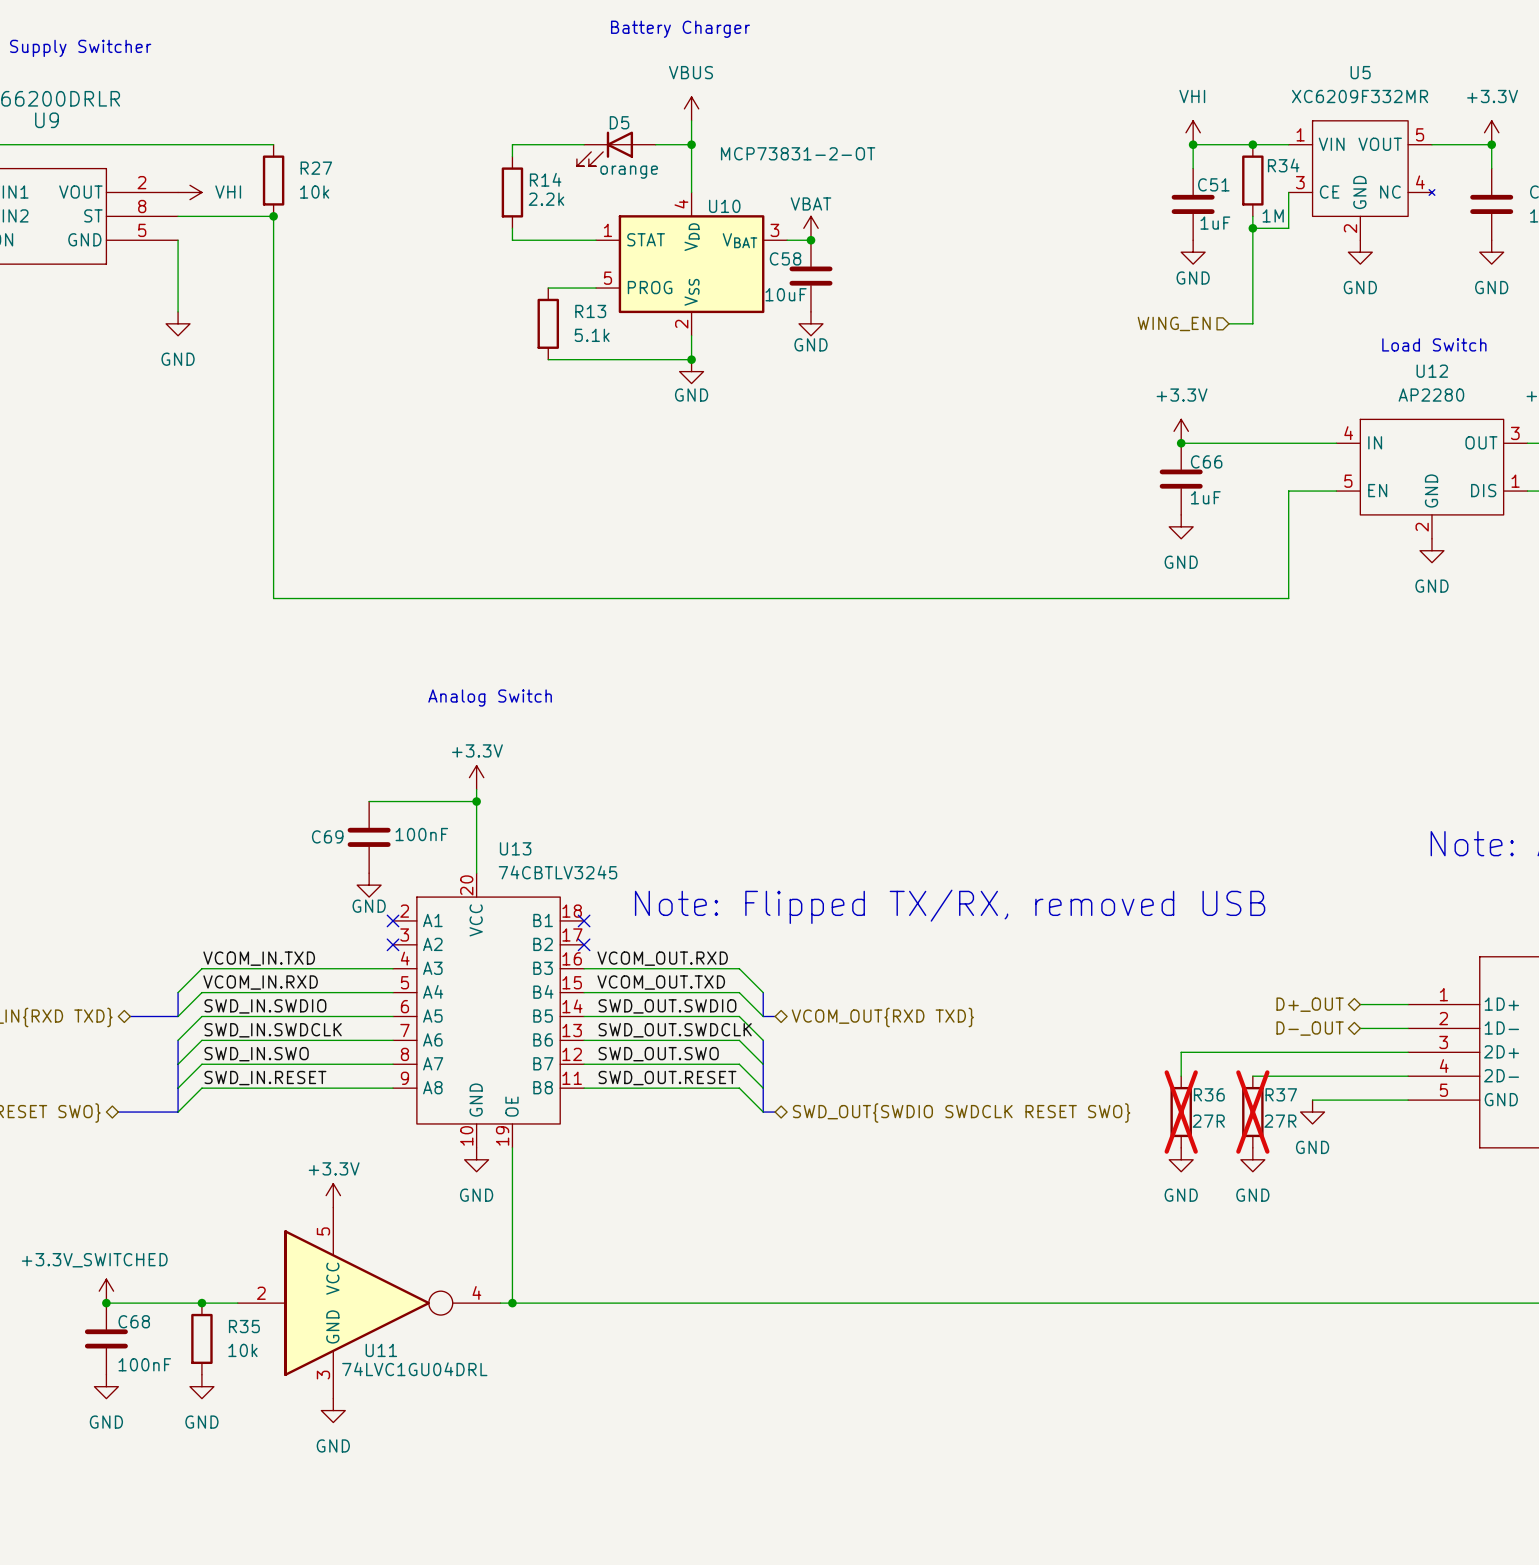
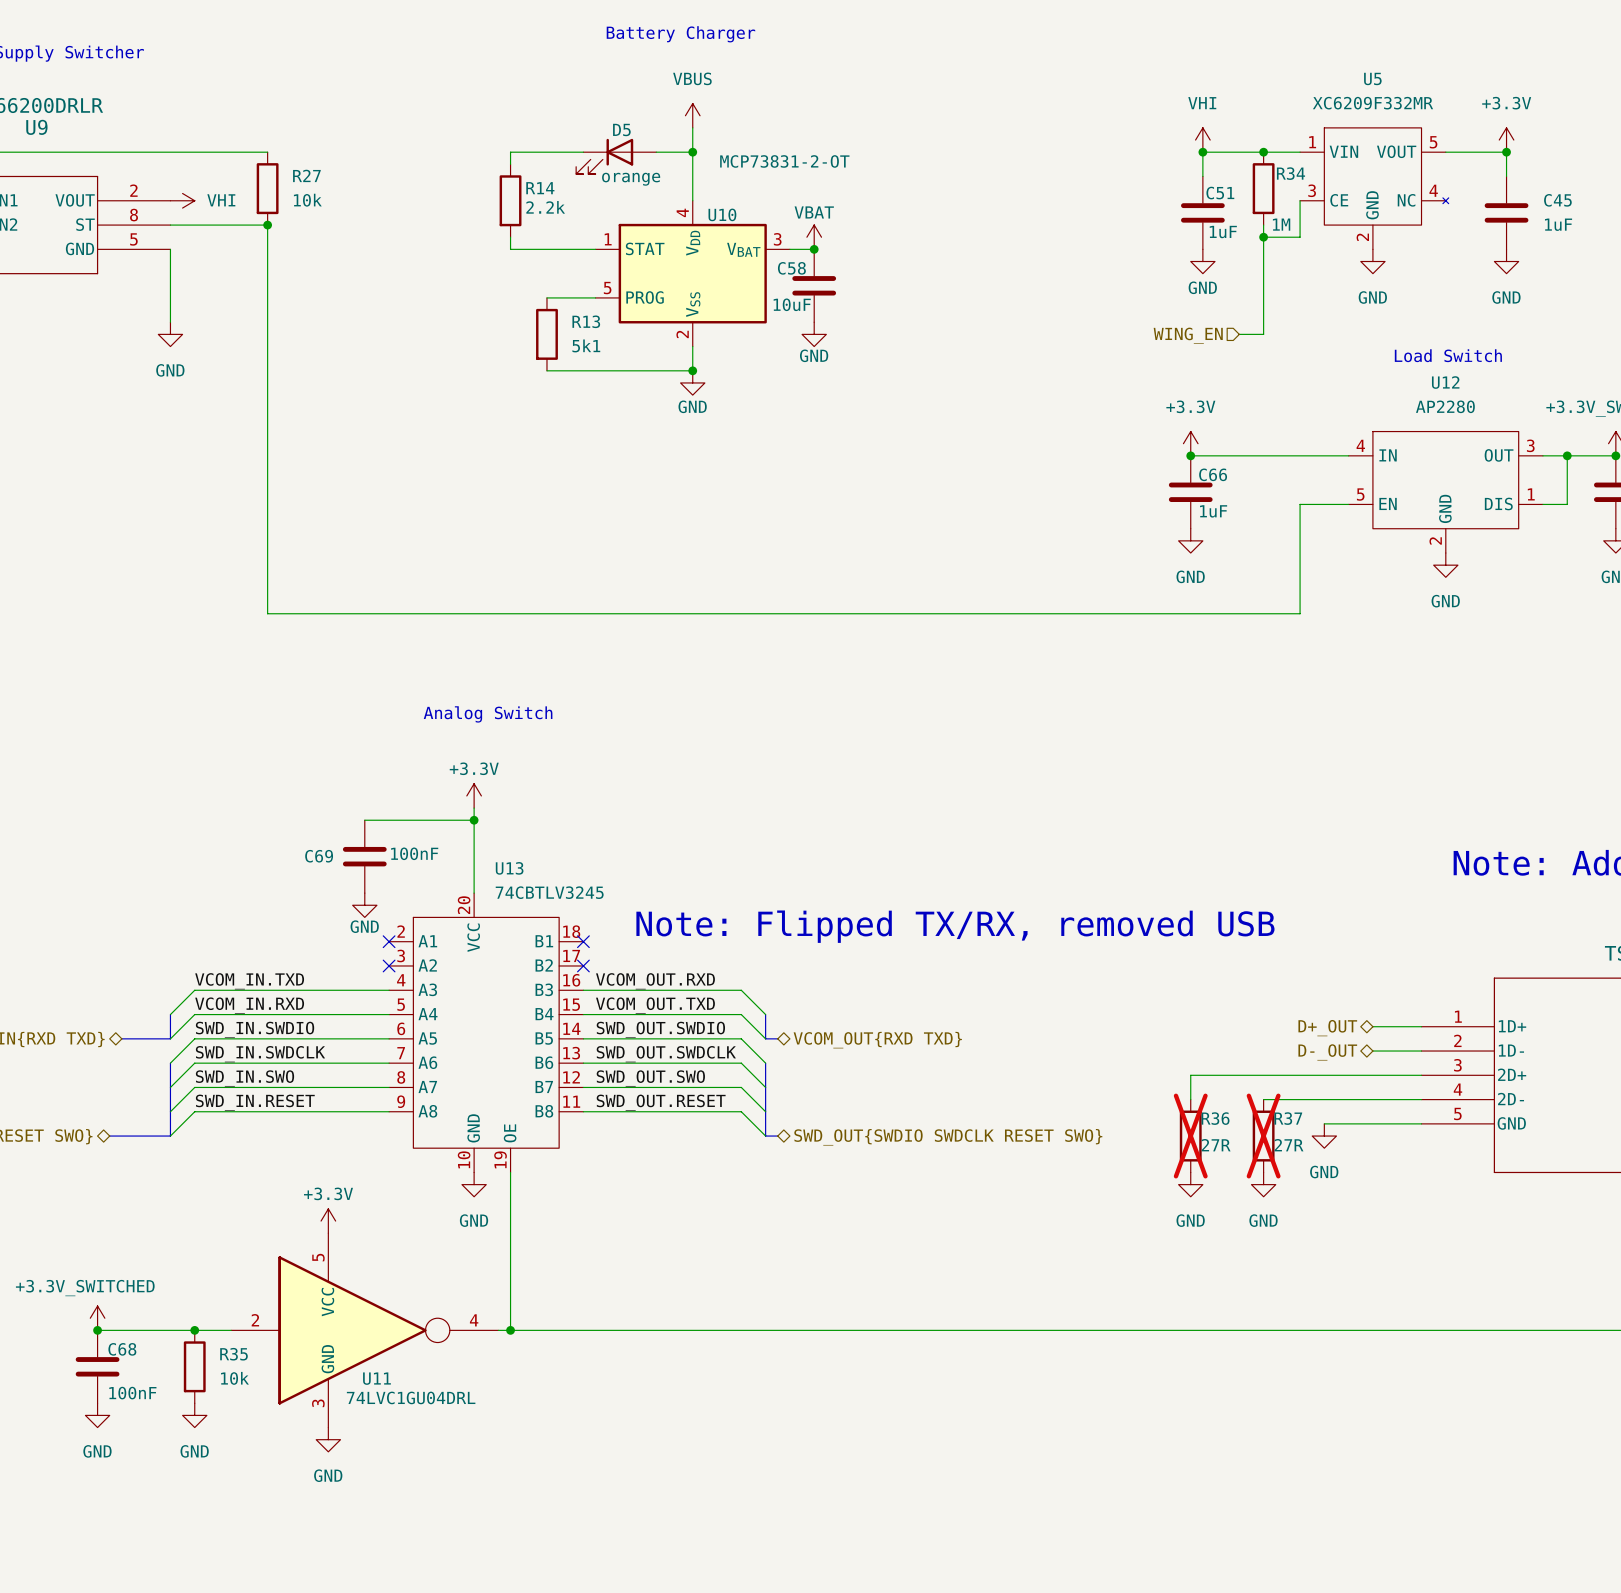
R13 value: 5.1k (592, 335) -> 5k1 (586, 345)

